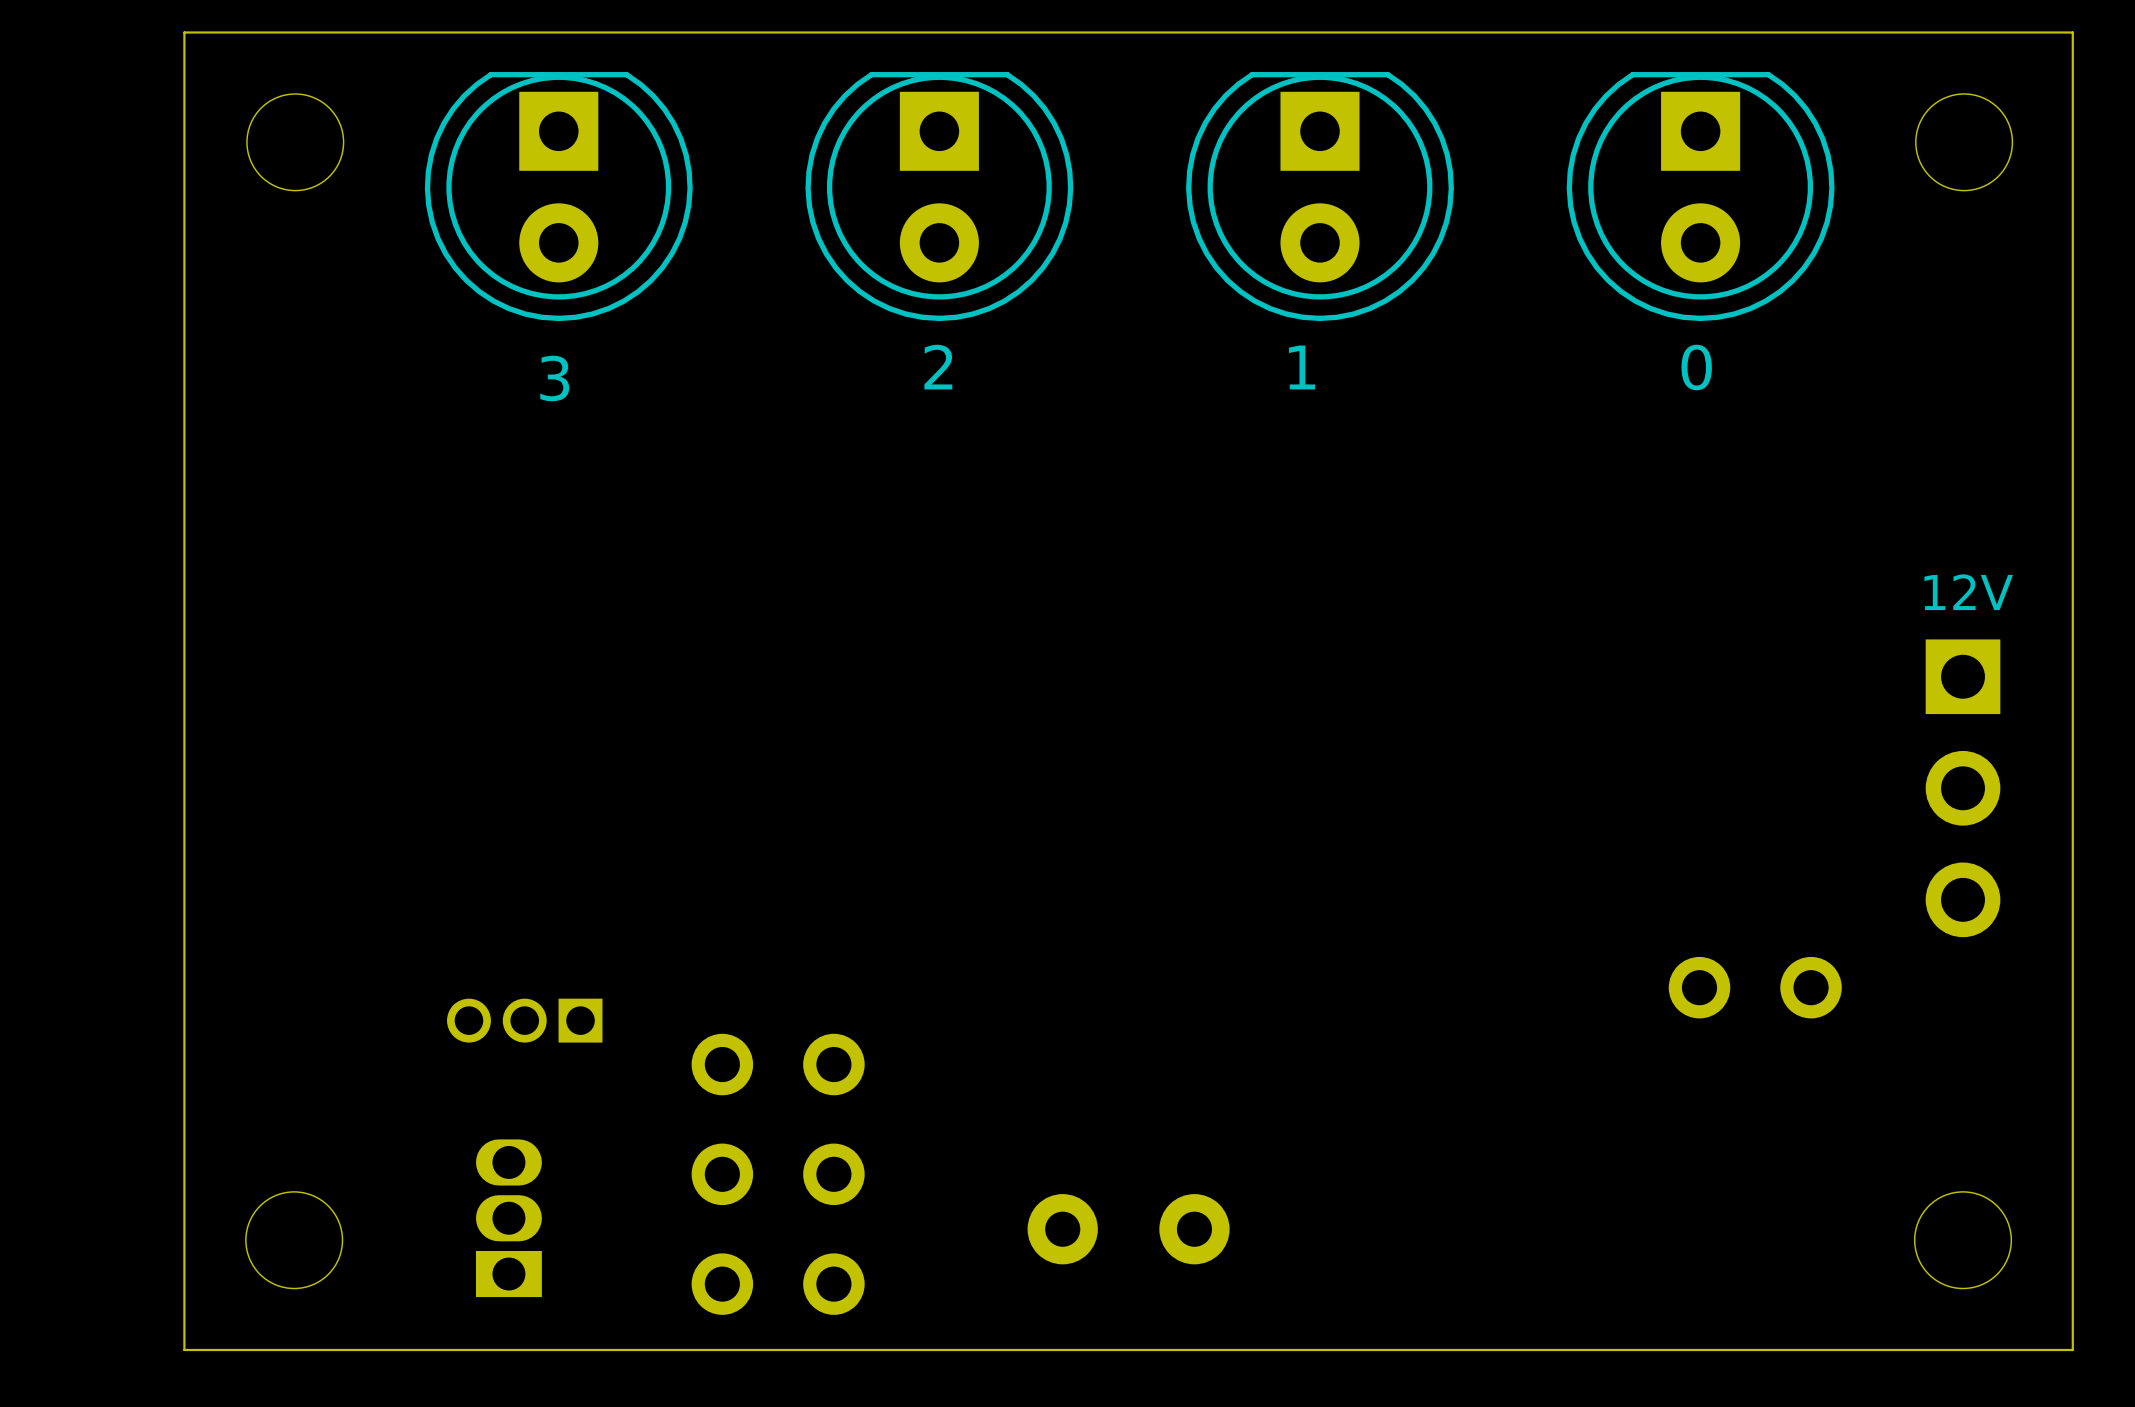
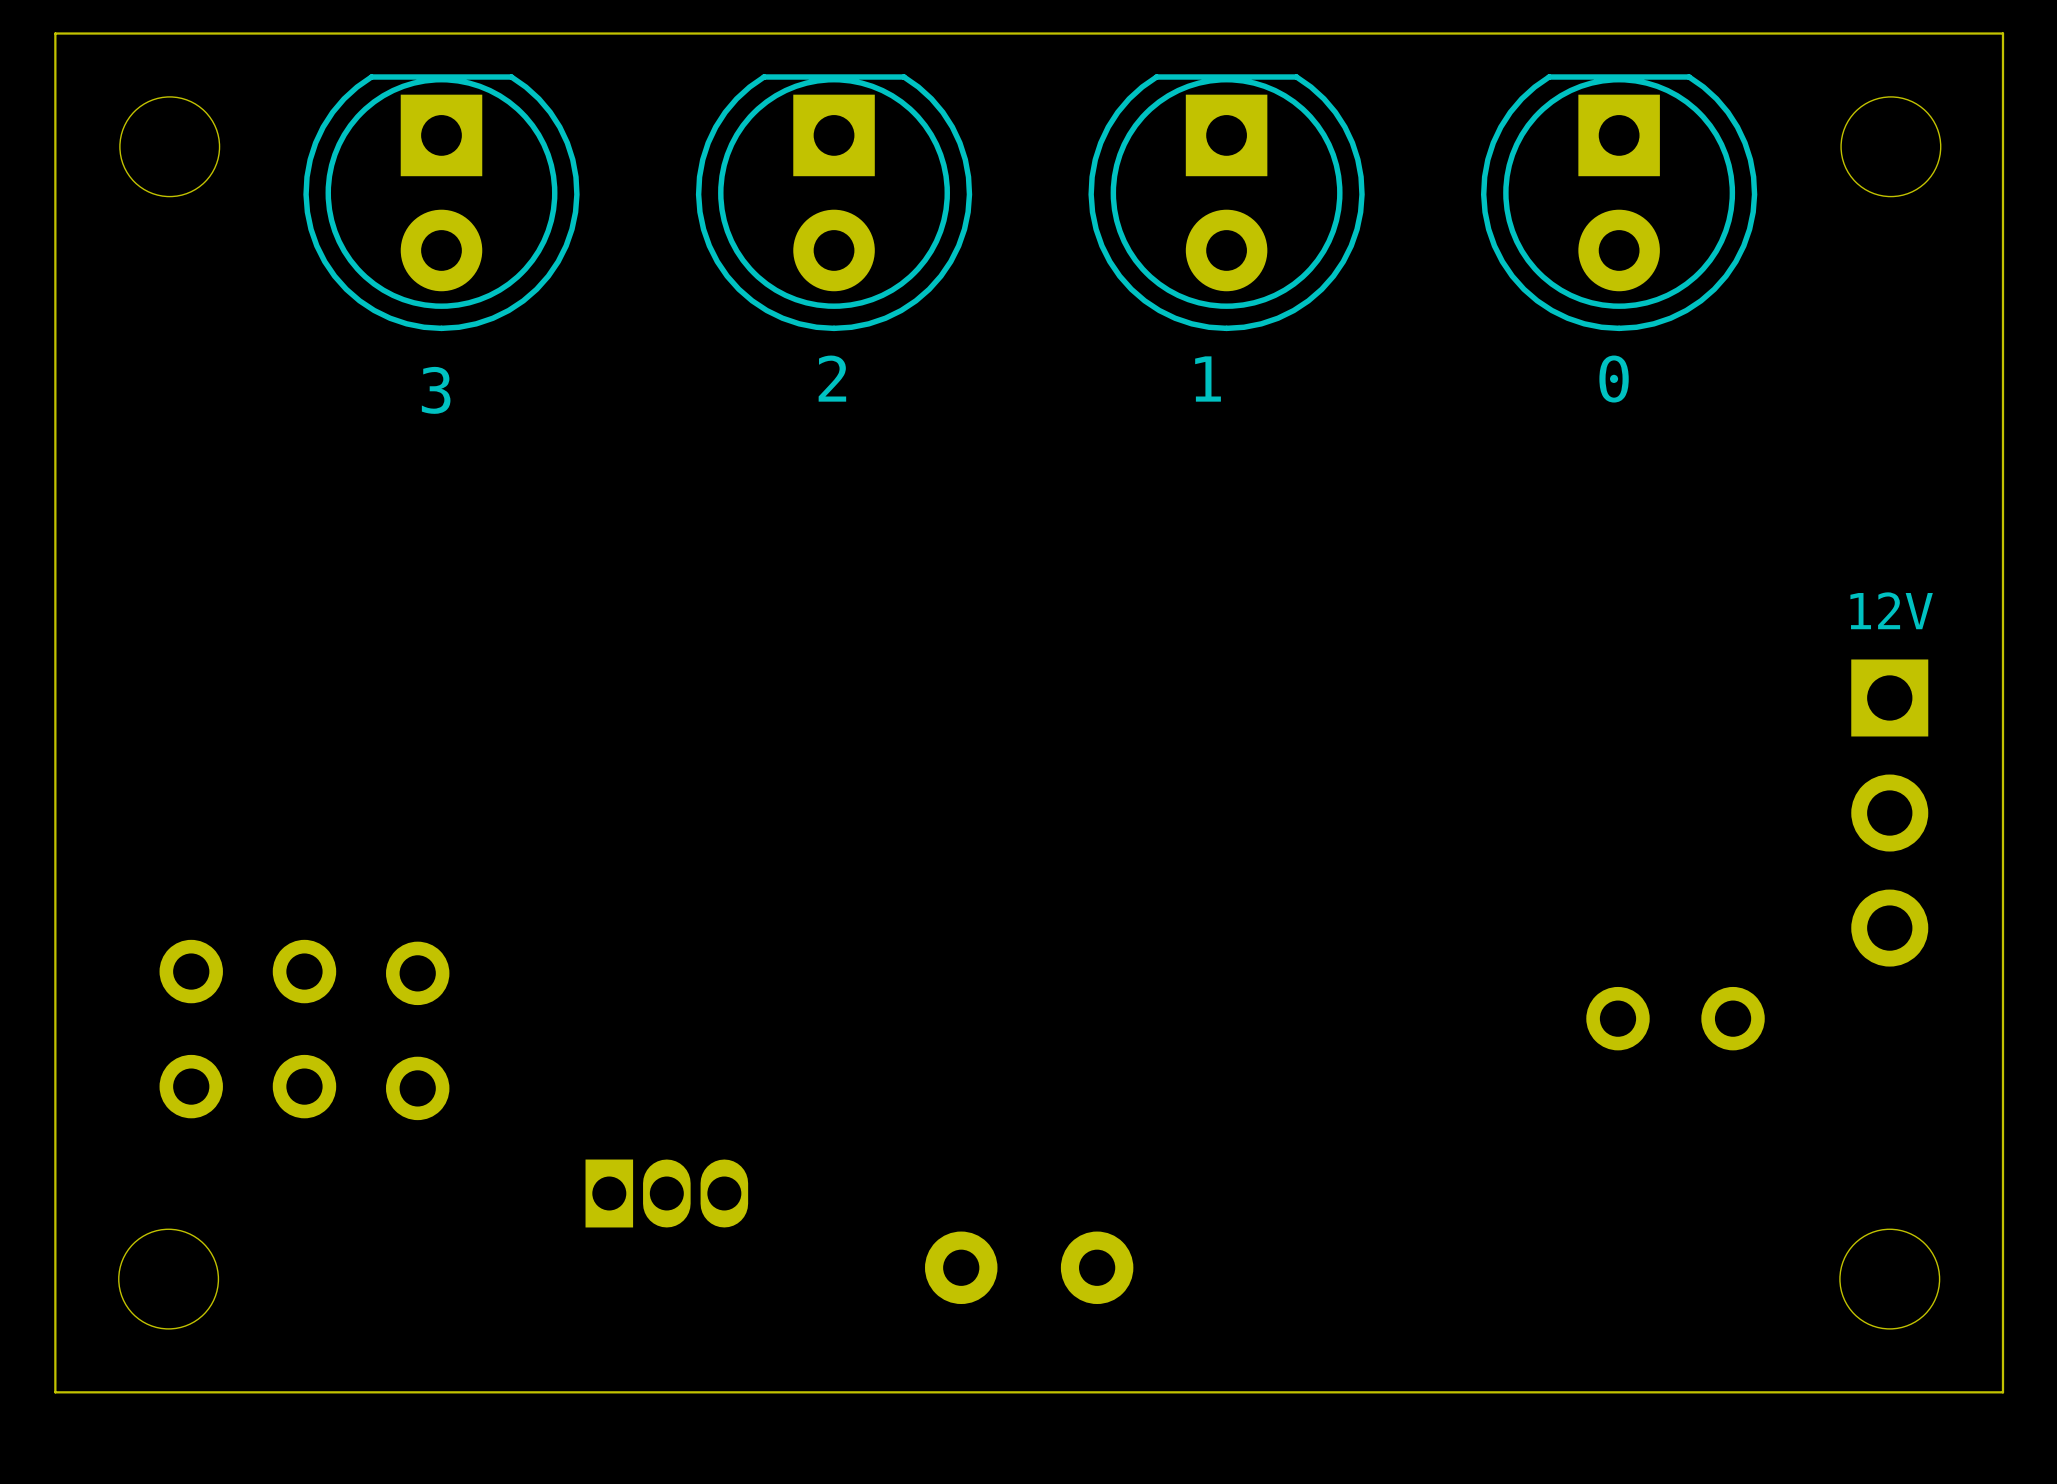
part: none -> (191, 1029)
part: none -> (304, 1029)
part footprint: [447, 998, 603, 1043] -> [386, 941, 450, 1121]
part: (778, 1064) -> none
part footprint: [691, 1143, 865, 1206] -> [585, 1159, 749, 1228]
part: (508, 1218) -> none
part: (778, 1284) -> none

